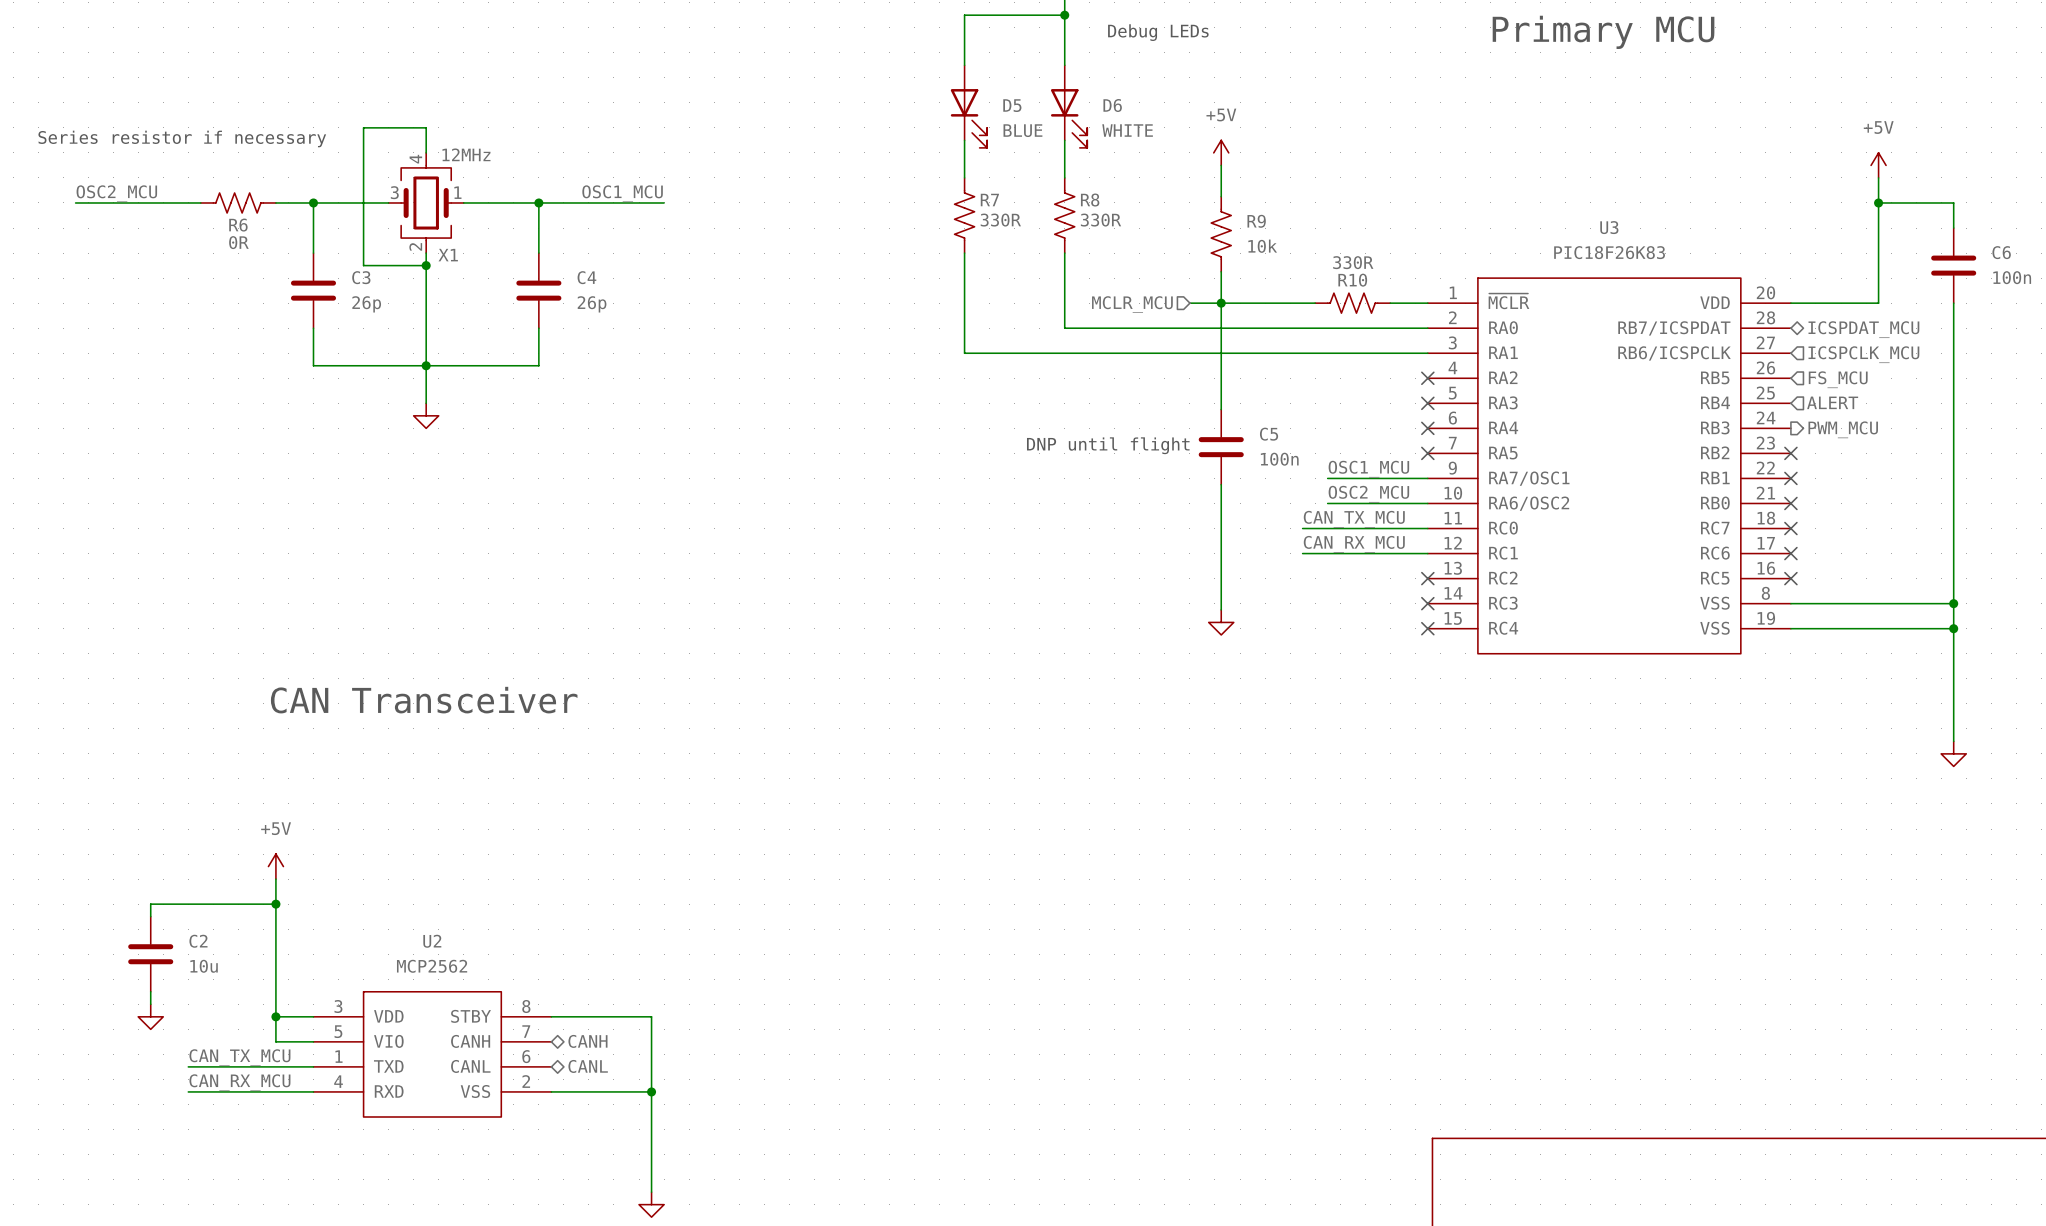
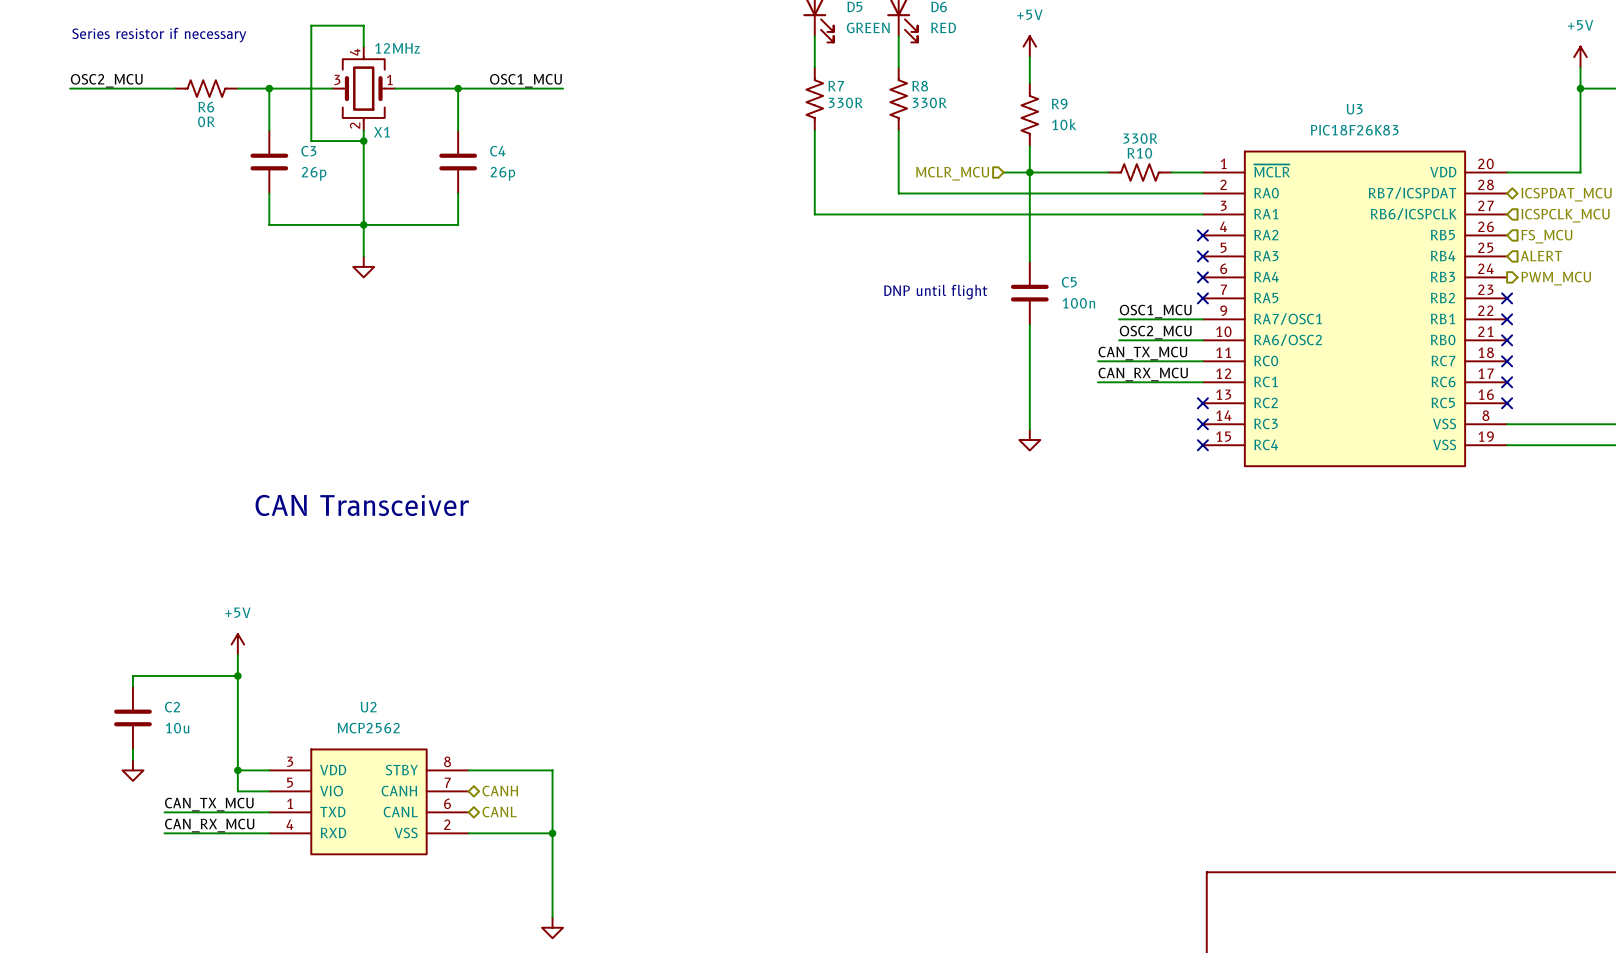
D5 value: BLUE (1022, 130) -> GREEN (868, 27)
D6 value: WHITE (1127, 130) -> RED (943, 27)

